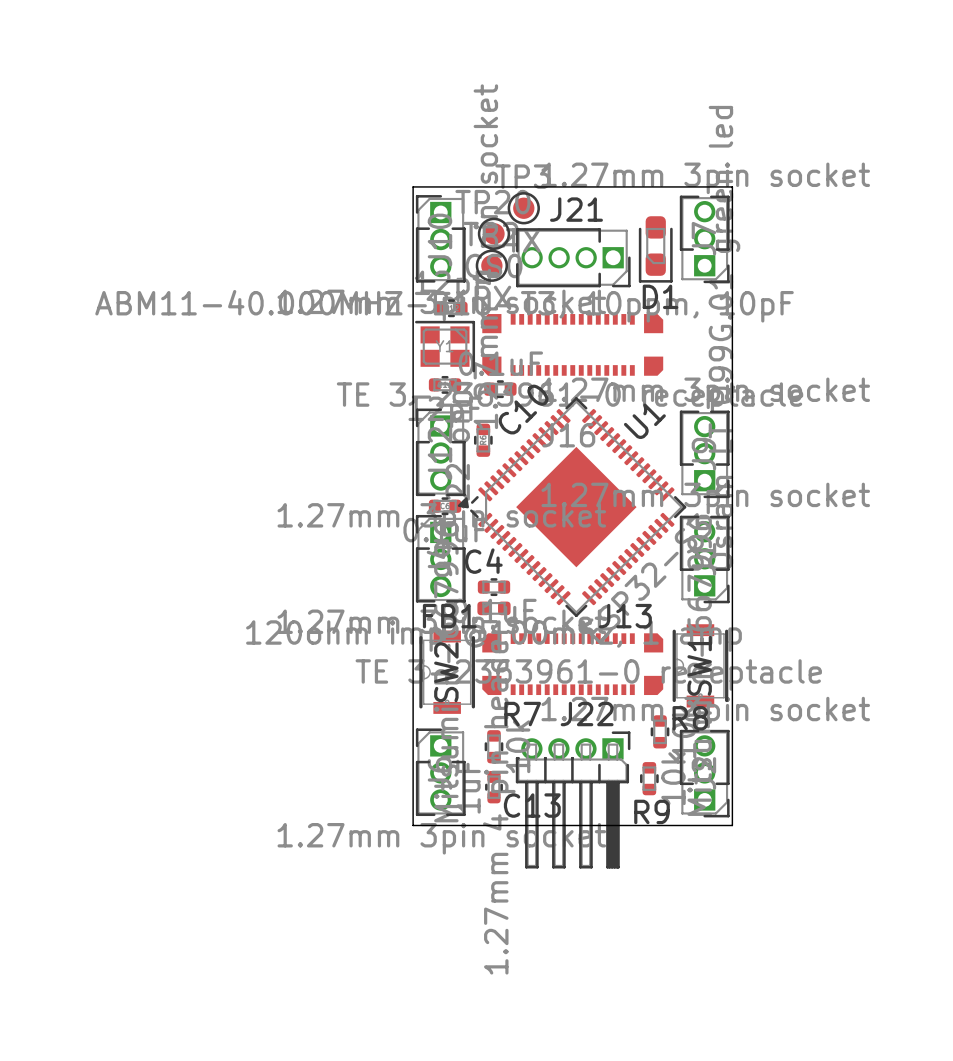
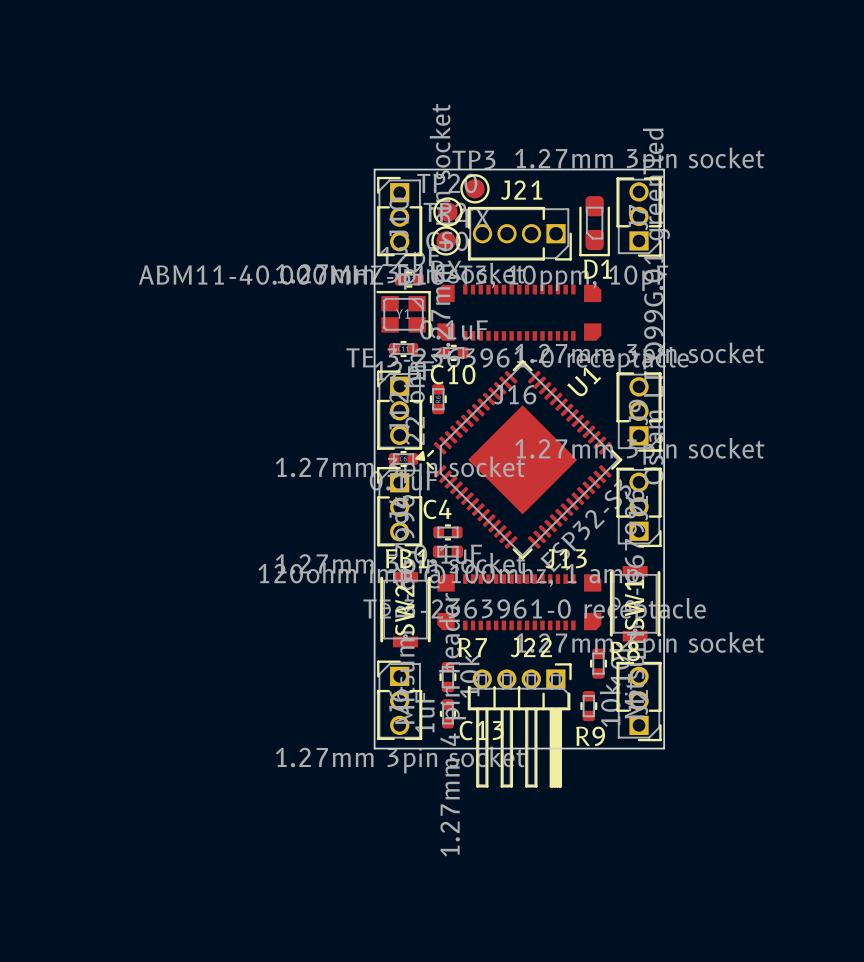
C10 name rotation: 0° (523, 409) -> 45° clockwise (453, 374)

